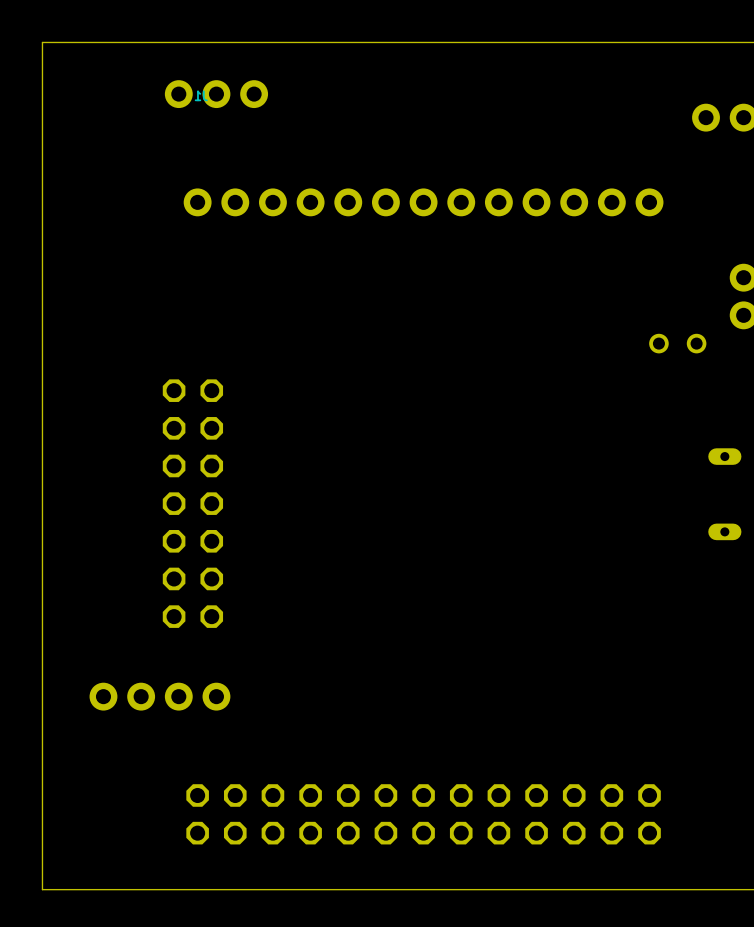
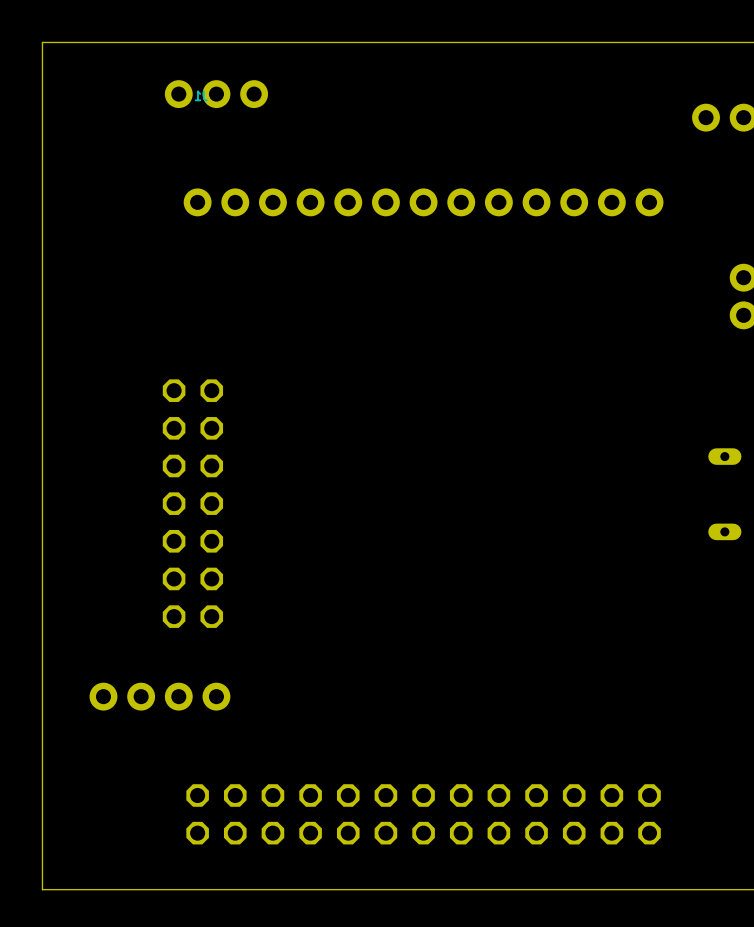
part: (677, 343) -> none

